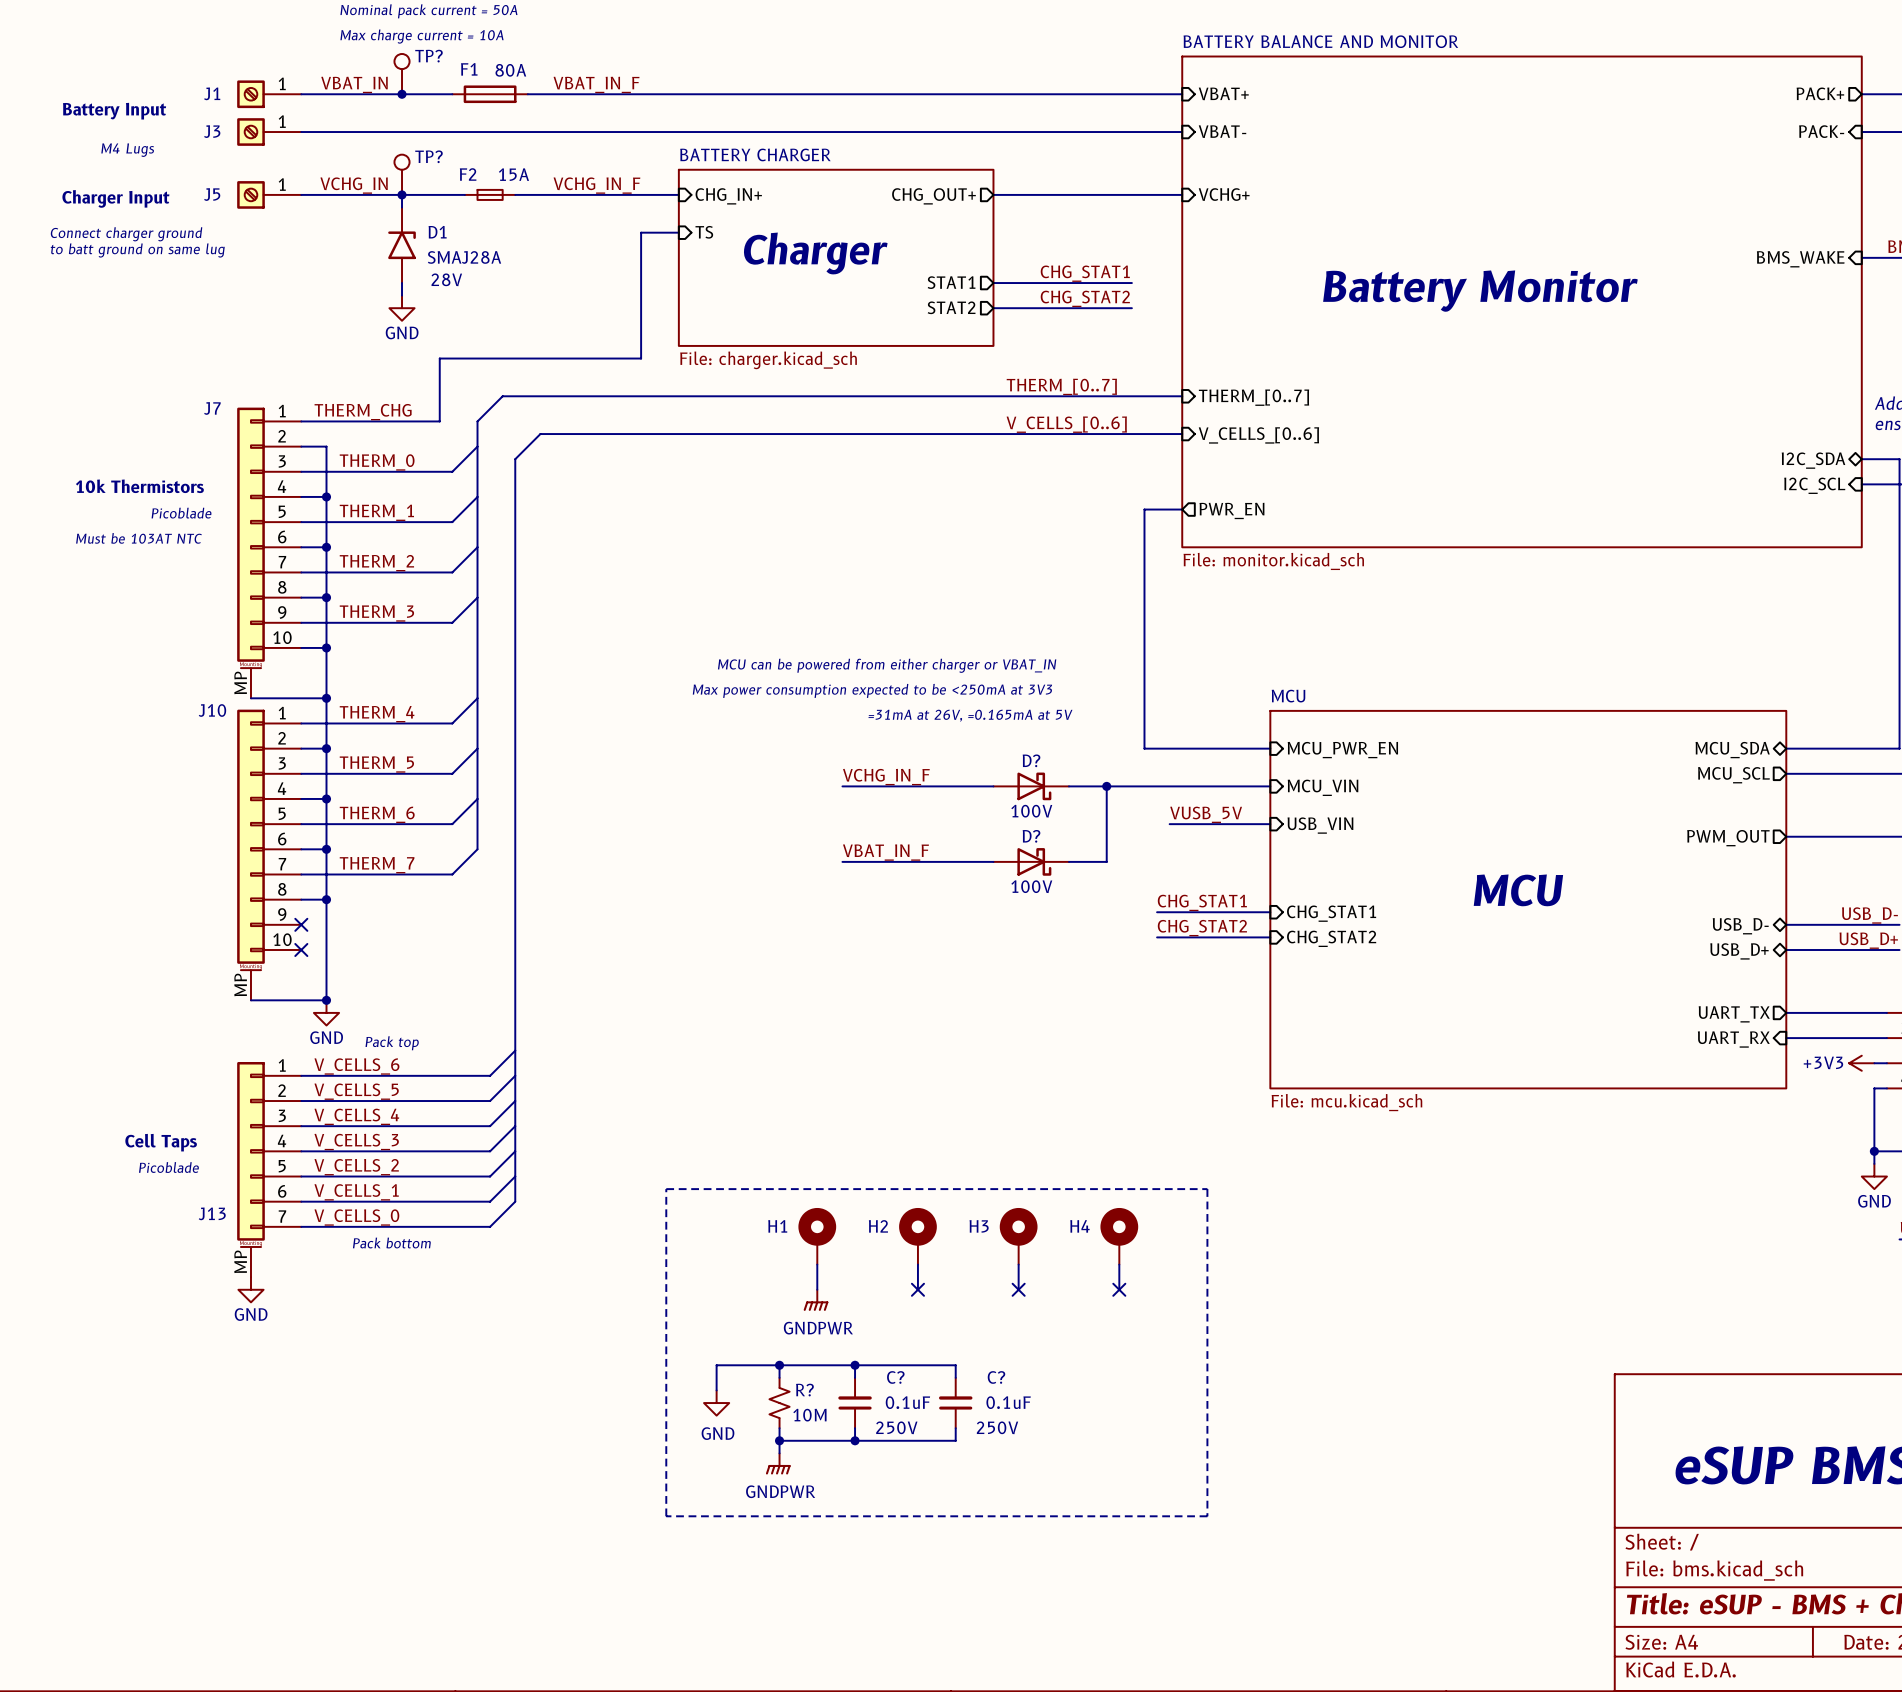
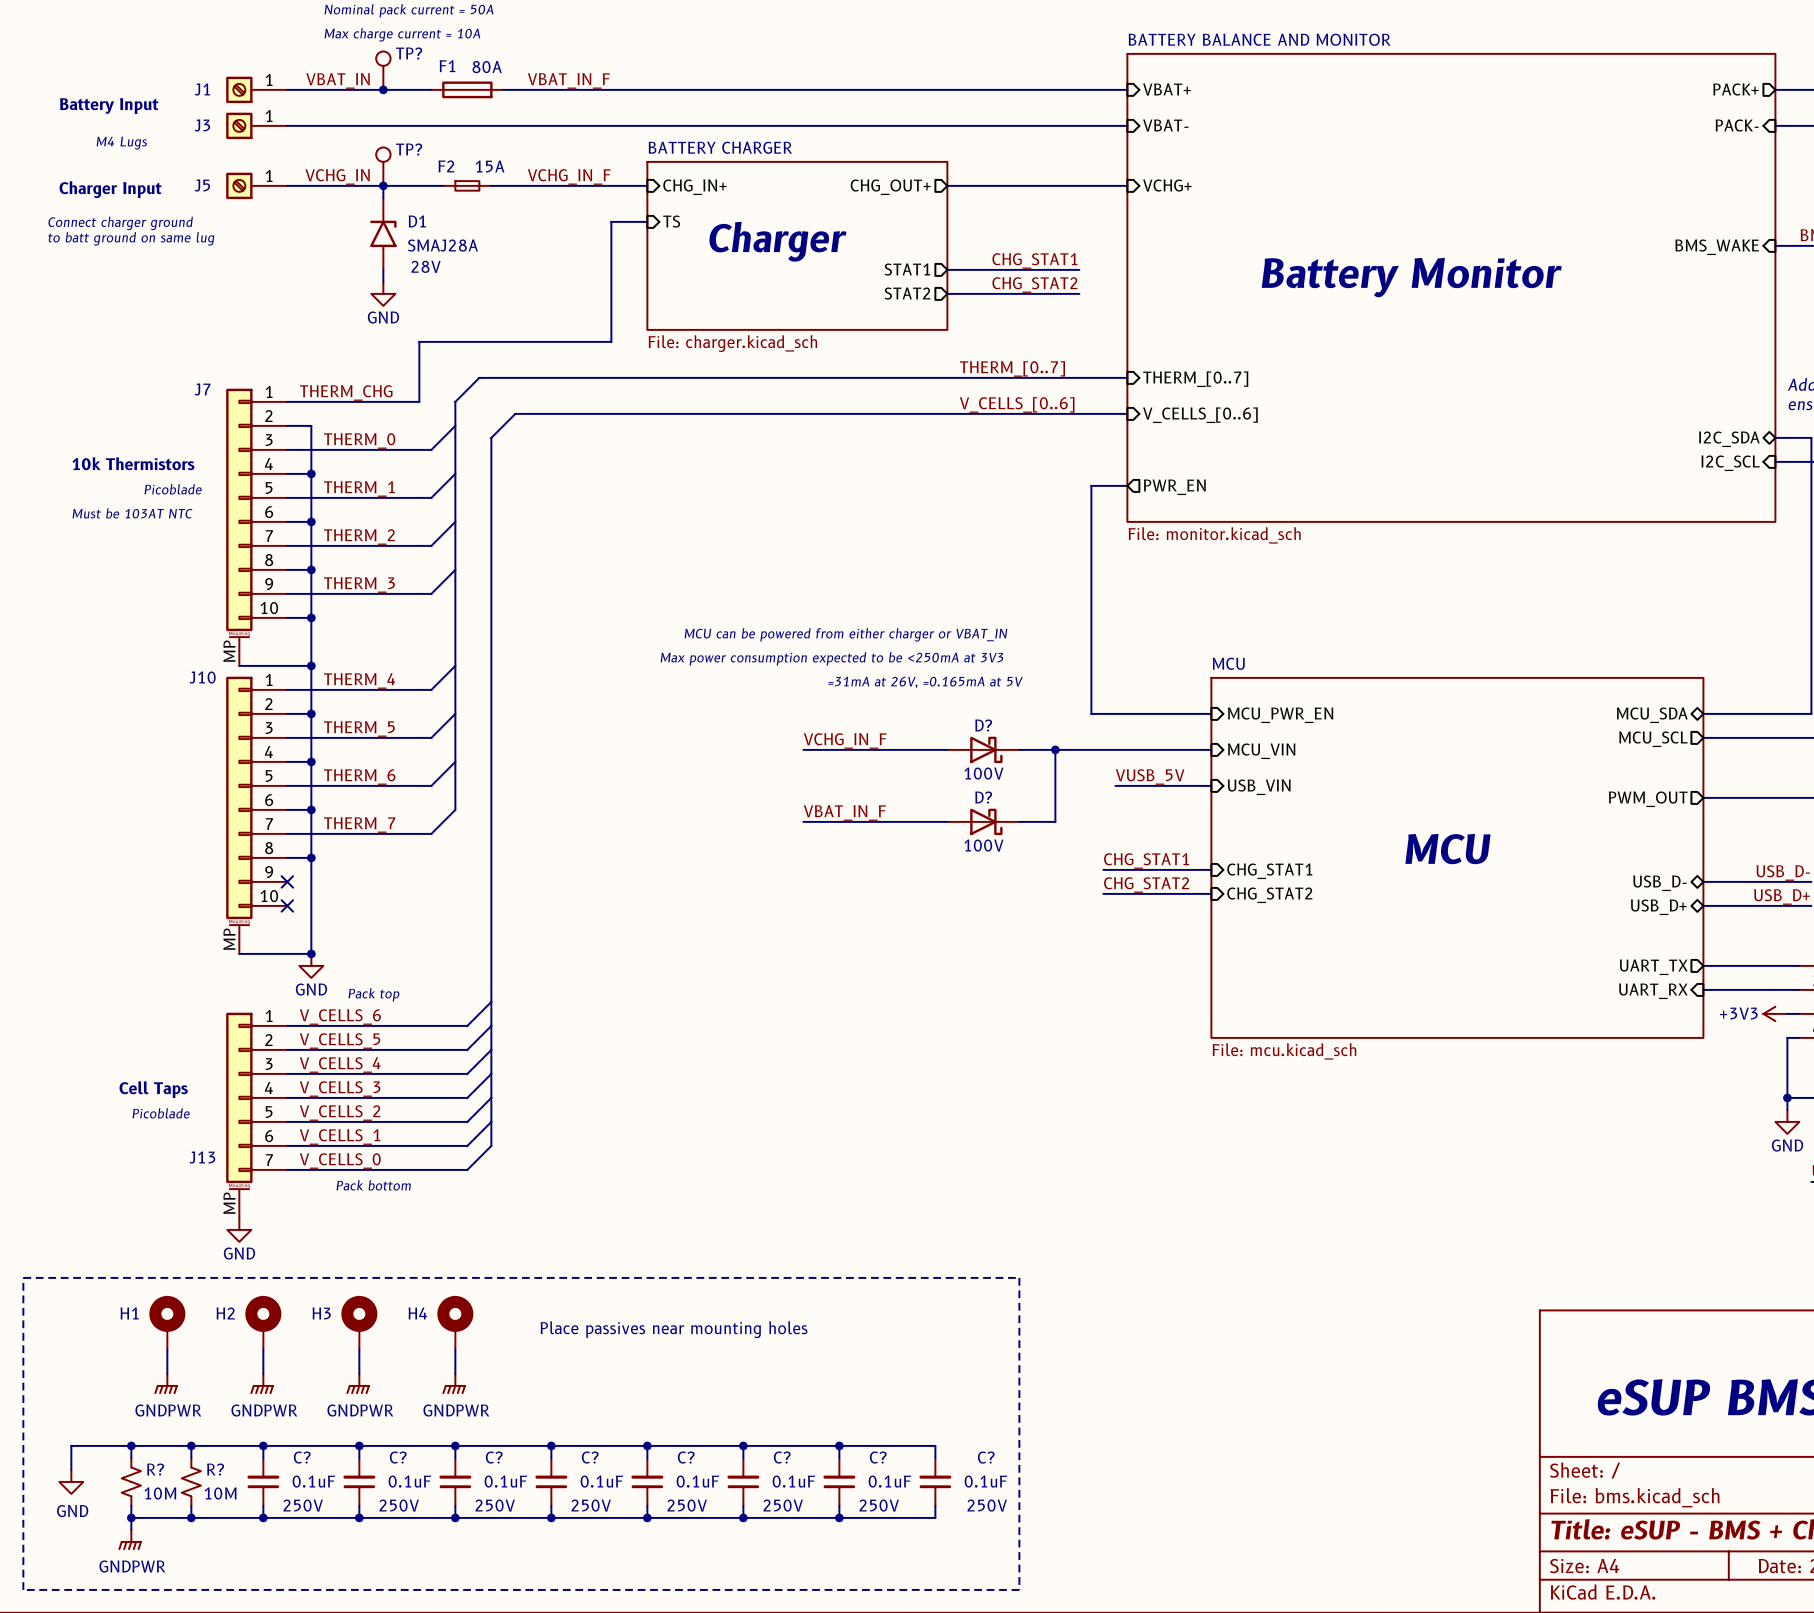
line: (666, 1189) (1207, 1189) (1207, 1516) (666, 1516) (666, 1189) -> none
H1 position: (817, 1236) -> (167, 1322)
H2 position: (917, 1236) -> (263, 1322)
H3 position: (1018, 1236) -> (359, 1322)
H4 position: (1119, 1236) -> (455, 1322)
wire: (817, 1264) (817, 1289) -> none
wire: (917, 1264) (917, 1289) -> none
wire: (1018, 1264) (1018, 1289) -> none
wire: (1119, 1264) (1119, 1289) -> none
no-connect mark: (917, 1289) -> none
no-connect mark: (1018, 1289) -> none
no-connect mark: (1119, 1289) -> none
power symbol: GNDPWR (816, 1300) -> none
line: none -> (23, 1277) (1019, 1277) (1019, 1589) (23, 1589) (23, 1277)
wire: (779, 1365) (779, 1377) -> (743, 1445) (743, 1457)
junction: (779, 1365) -> none
wire: (855, 1365) (855, 1377) -> (839, 1445) (839, 1457)
junction: (855, 1365) -> none
wire: (955, 1377) (955, 1365) (716, 1365) (716, 1390) -> none
text: none -> Place passives near mounting holes (674, 1329)
power symbol: GND (716, 1403) -> none
R?: 10M (779, 1403) -> none
C?: 0.1uF (855, 1403) -> none
C?: 0.1uF (955, 1403) -> none
wire: none -> (167, 1349) (167, 1373)
wire: none -> (263, 1349) (263, 1373)
wire: none -> (359, 1349) (359, 1373)
wire: none -> (455, 1349) (455, 1373)
wire: (779, 1428) (779, 1453) -> none
wire: (855, 1428) (855, 1440) -> (839, 1505) (839, 1517)
wire: (955, 1428) (955, 1440) (779, 1440) -> none
junction: (779, 1440) -> none
junction: (855, 1440) -> none
power symbol: none -> GNDPWR (166, 1384)
power symbol: none -> GNDPWR (262, 1384)
power symbol: none -> GNDPWR (358, 1384)
power symbol: none -> GNDPWR (454, 1384)
power symbol: GNDPWR (778, 1463) -> none
wire: none -> (131, 1445) (131, 1457)
junction: none -> (131, 1445)
wire: none -> (191, 1445) (191, 1457)
junction: none -> (191, 1445)
wire: none -> (263, 1445) (263, 1457)
junction: none -> (263, 1445)
wire: none -> (359, 1445) (359, 1457)
junction: none -> (359, 1445)
wire: none -> (455, 1445) (455, 1457)
junction: none -> (455, 1445)
wire: none -> (551, 1445) (551, 1457)
junction: none -> (551, 1445)
wire: none -> (647, 1445) (647, 1457)
junction: none -> (647, 1445)
junction: none -> (743, 1445)
junction: none -> (839, 1445)
wire: none -> (935, 1457) (935, 1445) (71, 1445) (71, 1469)
power symbol: none -> GND (71, 1481)
R?: none -> 10M (131, 1481)
R?: none -> 10M (191, 1481)
C?: none -> 0.1uF (263, 1481)
C?: none -> 0.1uF (359, 1481)
C?: none -> 0.1uF (455, 1481)
C?: none -> 0.1uF (551, 1481)
C?: none -> 0.1uF (647, 1481)
C?: none -> 0.1uF (743, 1481)
C?: none -> 0.1uF (839, 1481)
C?: none -> 0.1uF (935, 1481)
wire: none -> (131, 1505) (131, 1529)
wire: none -> (191, 1505) (191, 1517)
wire: none -> (263, 1505) (263, 1517)
wire: none -> (359, 1505) (359, 1517)
wire: none -> (455, 1505) (455, 1517)
wire: none -> (551, 1505) (551, 1517)
wire: none -> (647, 1505) (647, 1517)
wire: none -> (743, 1505) (743, 1517)
wire: none -> (935, 1505) (935, 1517) (131, 1517)
junction: none -> (131, 1517)
junction: none -> (191, 1517)
junction: none -> (263, 1517)
junction: none -> (359, 1517)
junction: none -> (455, 1517)
junction: none -> (551, 1517)
junction: none -> (647, 1517)
junction: none -> (743, 1517)
junction: none -> (839, 1517)
power symbol: none -> GNDPWR (130, 1540)

